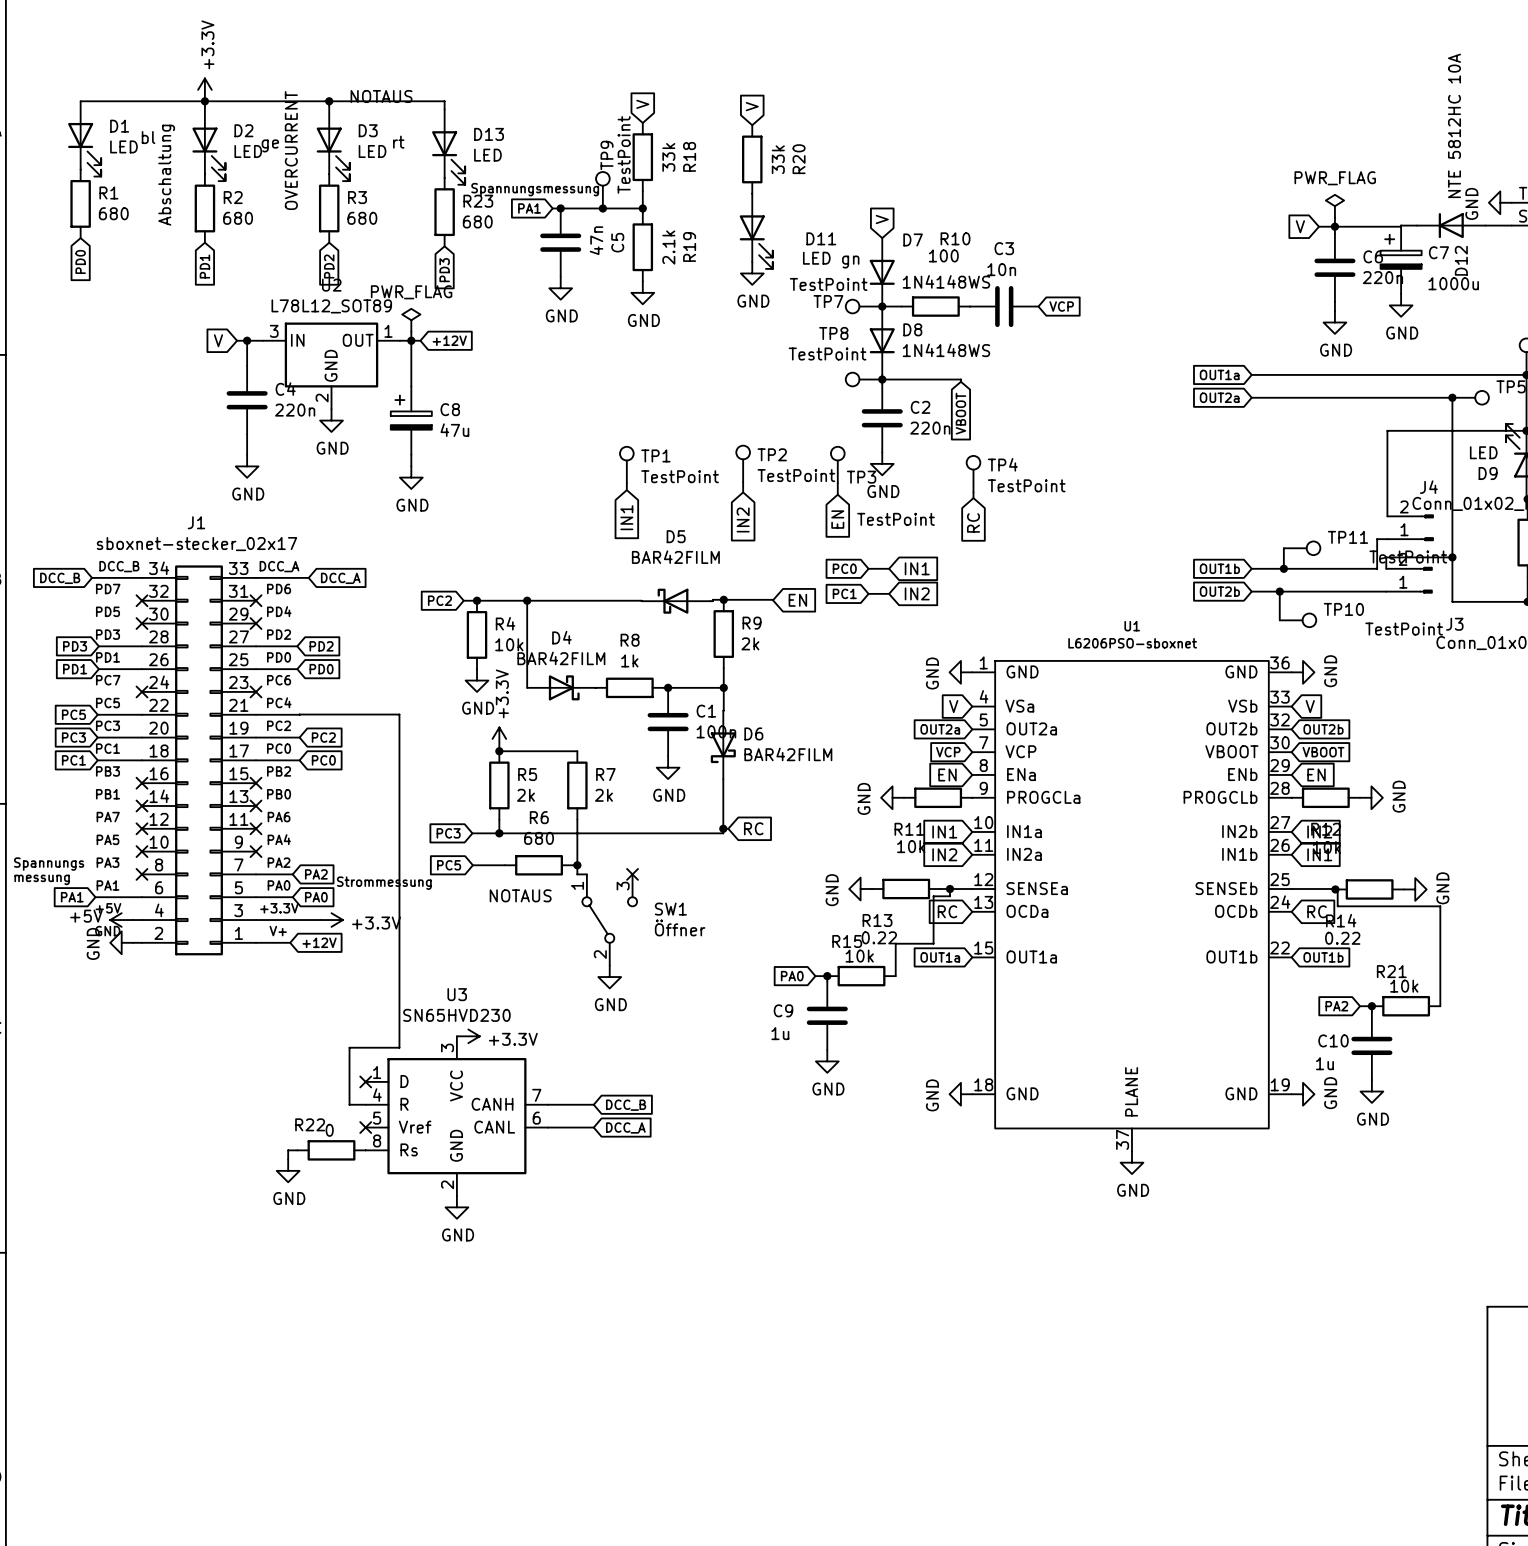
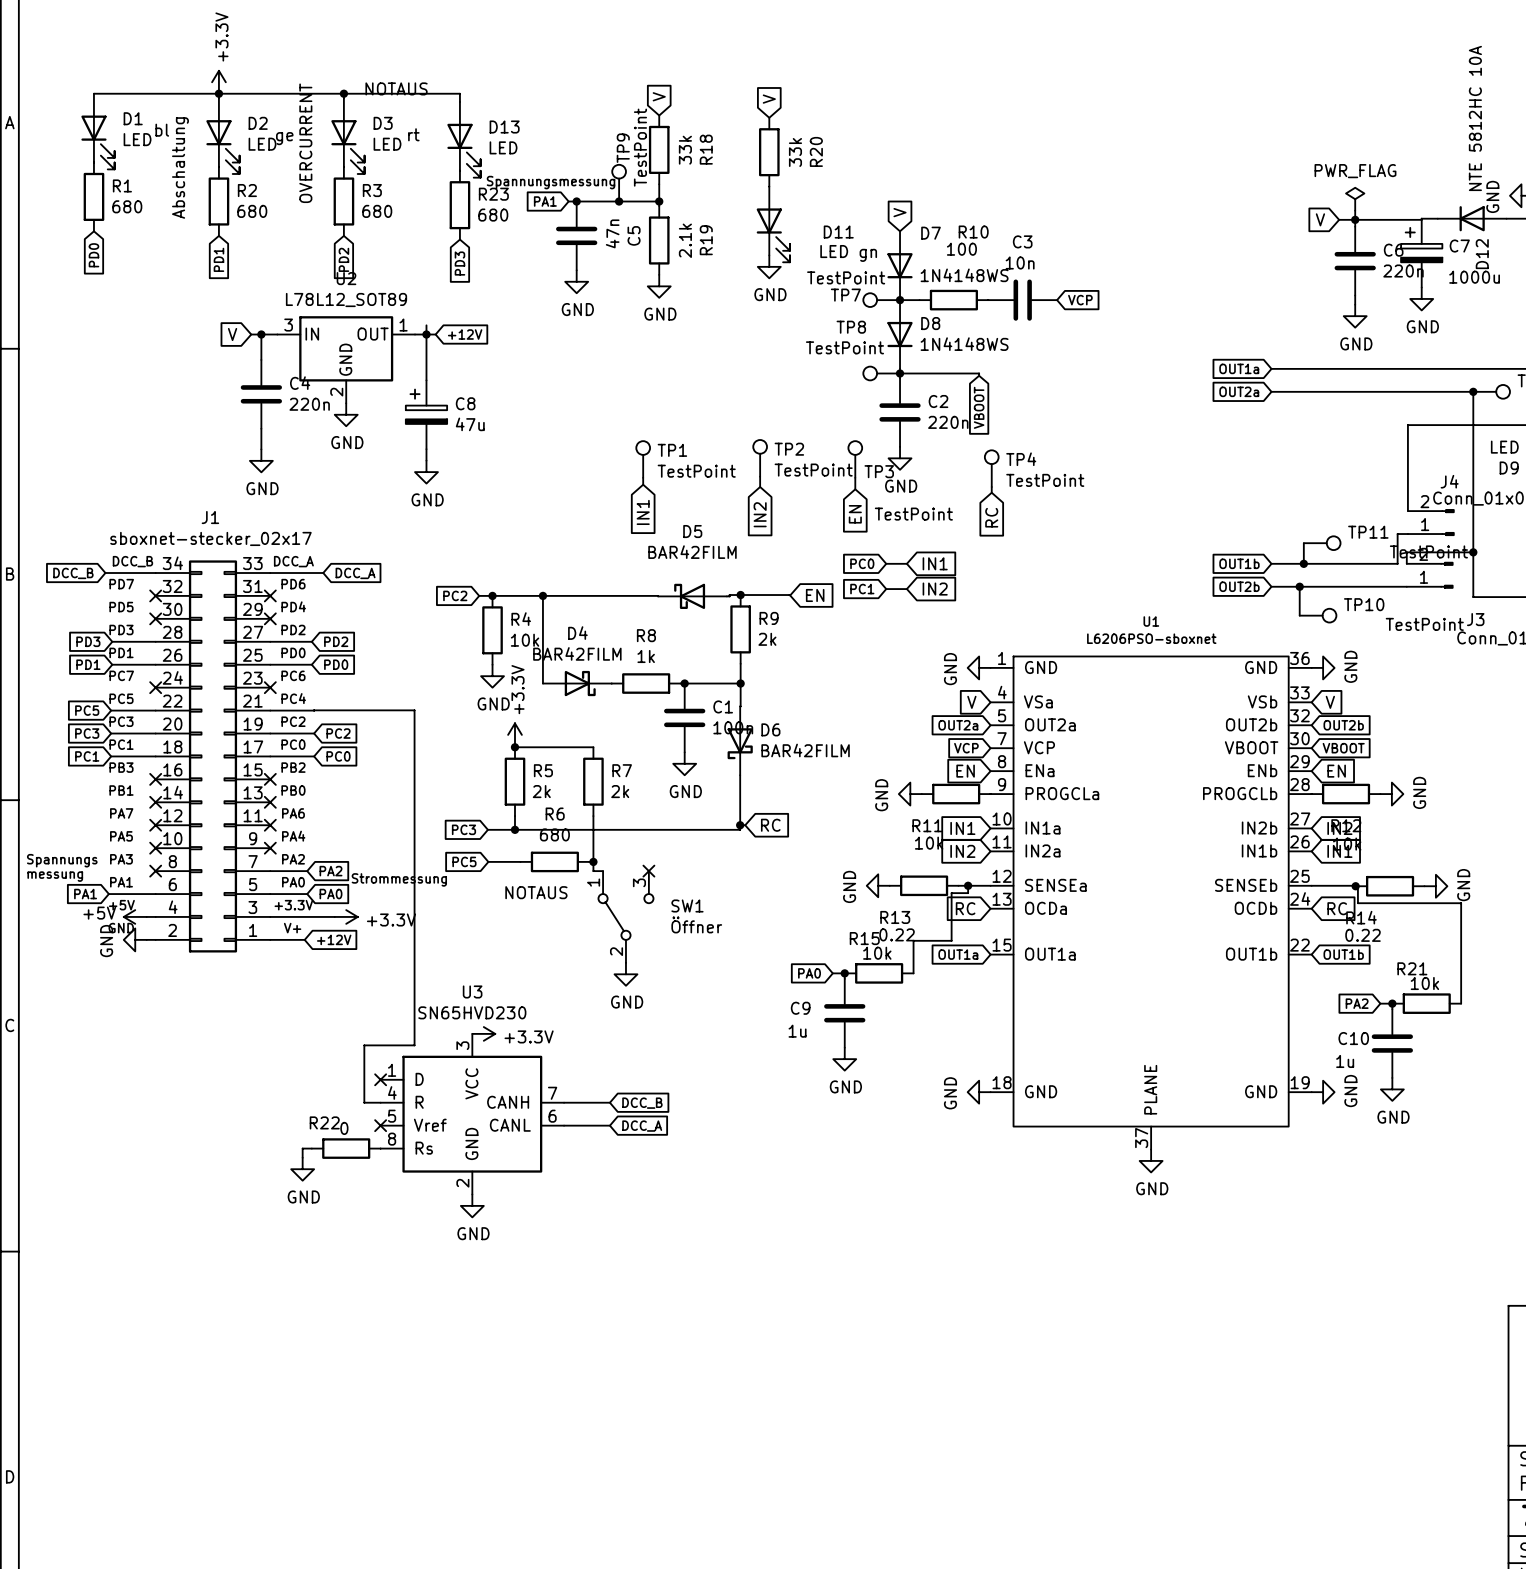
power symbol: PWR_FLAG (411, 320) -> none

